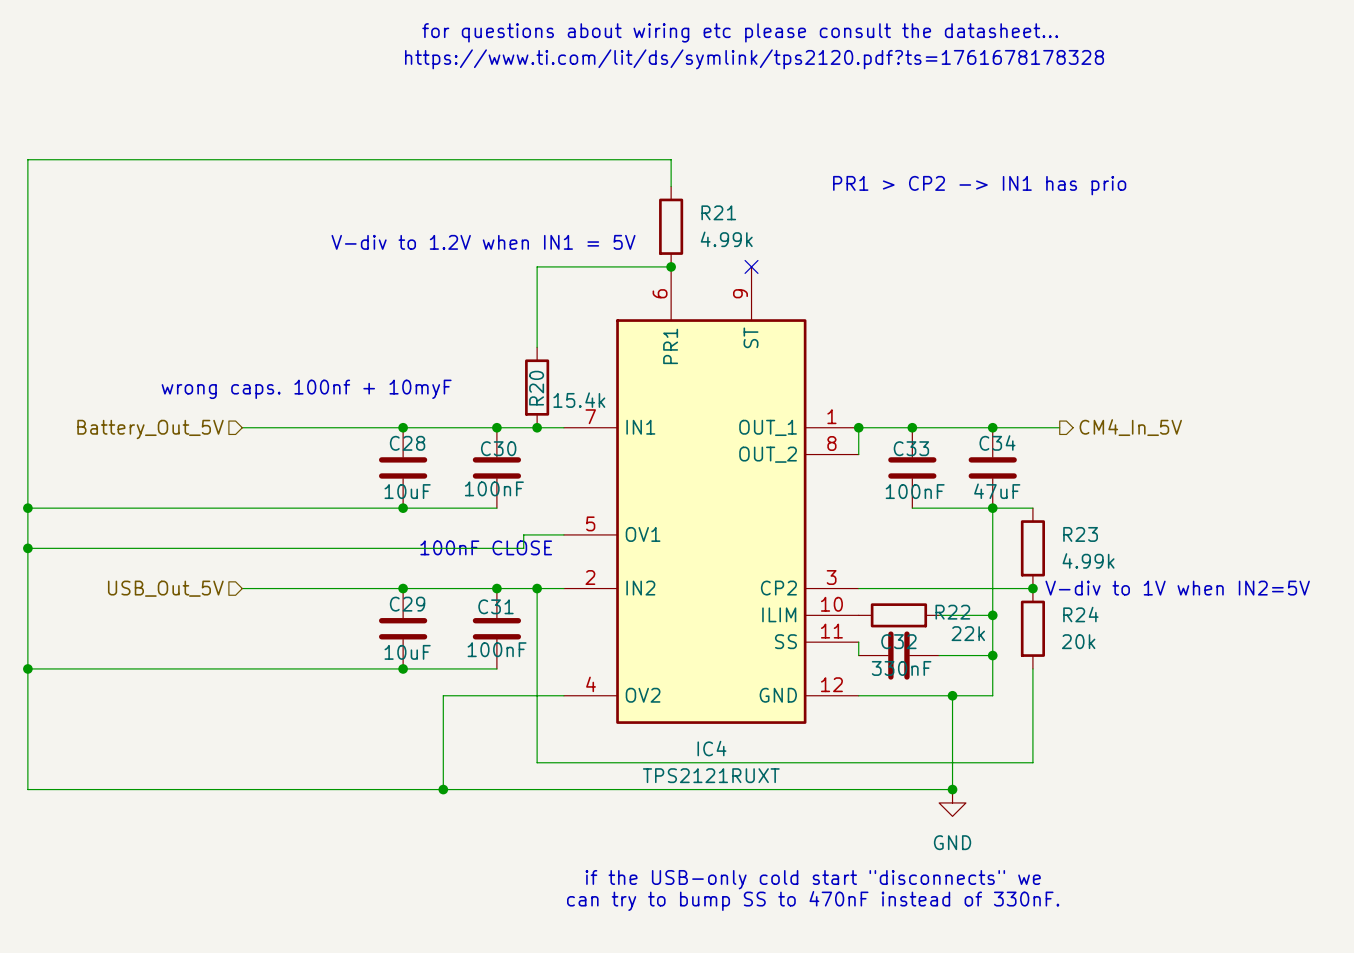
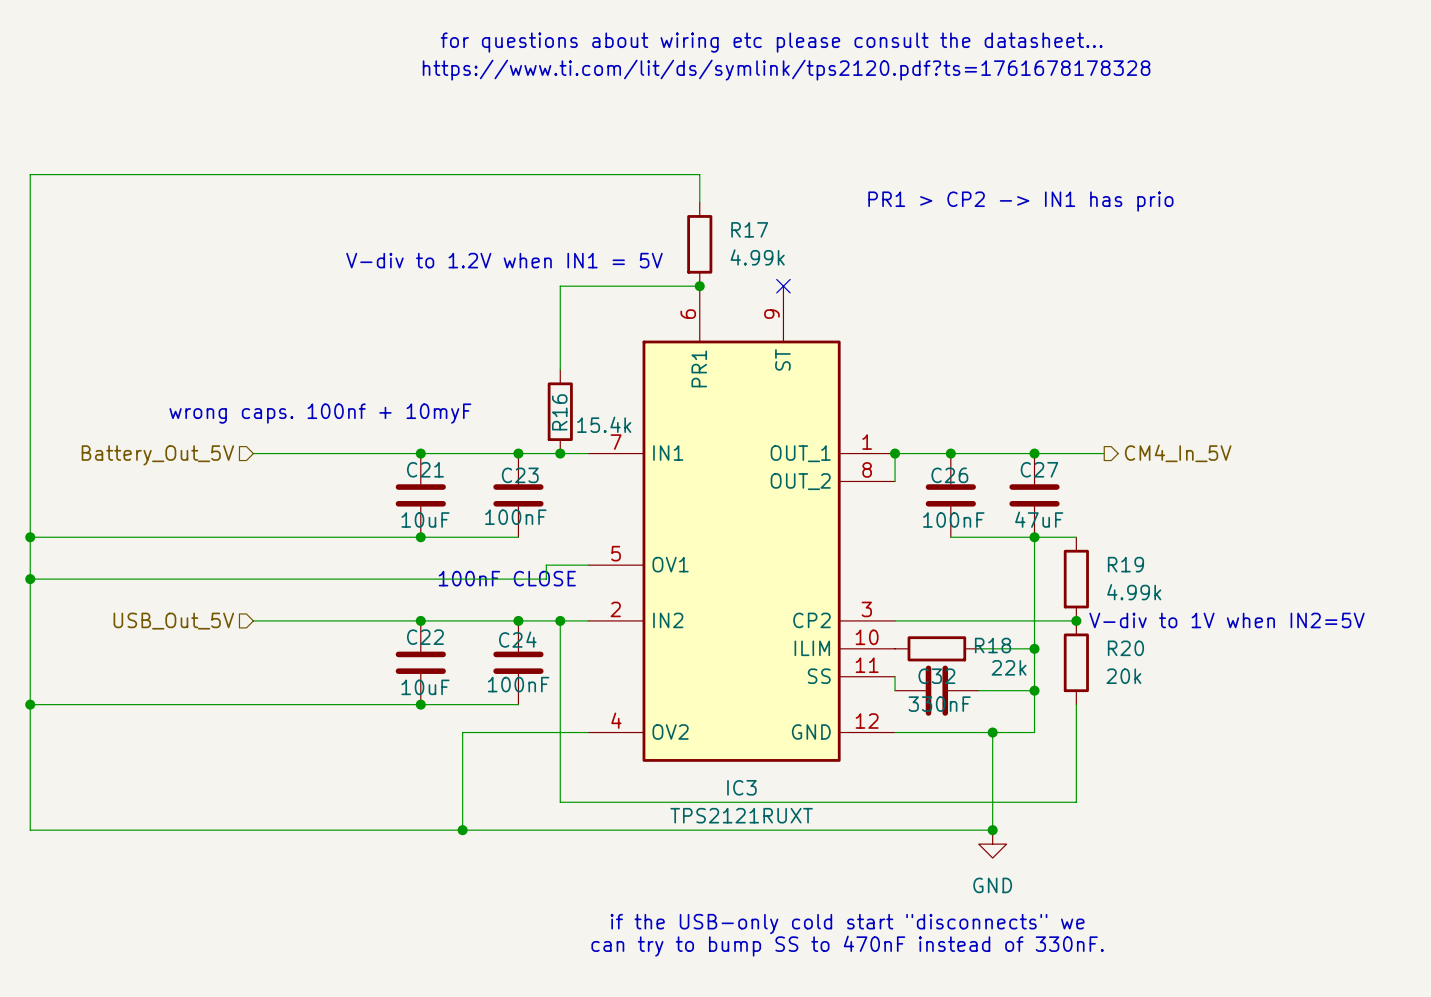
R21 name: R21 (718, 212) -> R17 (749, 229)
R20 name: R20 (536, 388) -> R16 (559, 412)
C28 name: C28 (407, 443) -> C21 (425, 469)
C34 name: C34 (997, 443) -> C27 (1039, 469)
C30 name: C30 (498, 448) -> C23 (520, 475)
C33 name: C33 (911, 448) -> C26 (949, 475)
R23 name: R23 (1080, 534) -> R19 (1125, 564)
C29 name: C29 (407, 604) -> C22 (425, 637)
C31 name: C31 (495, 606) -> C24 (517, 639)
R22 name: R22 (952, 612) -> R18 (993, 645)
R24 name: R24 (1080, 614) -> R20 (1125, 648)
IC4 name: IC4 (711, 748) -> IC3 (741, 787)

